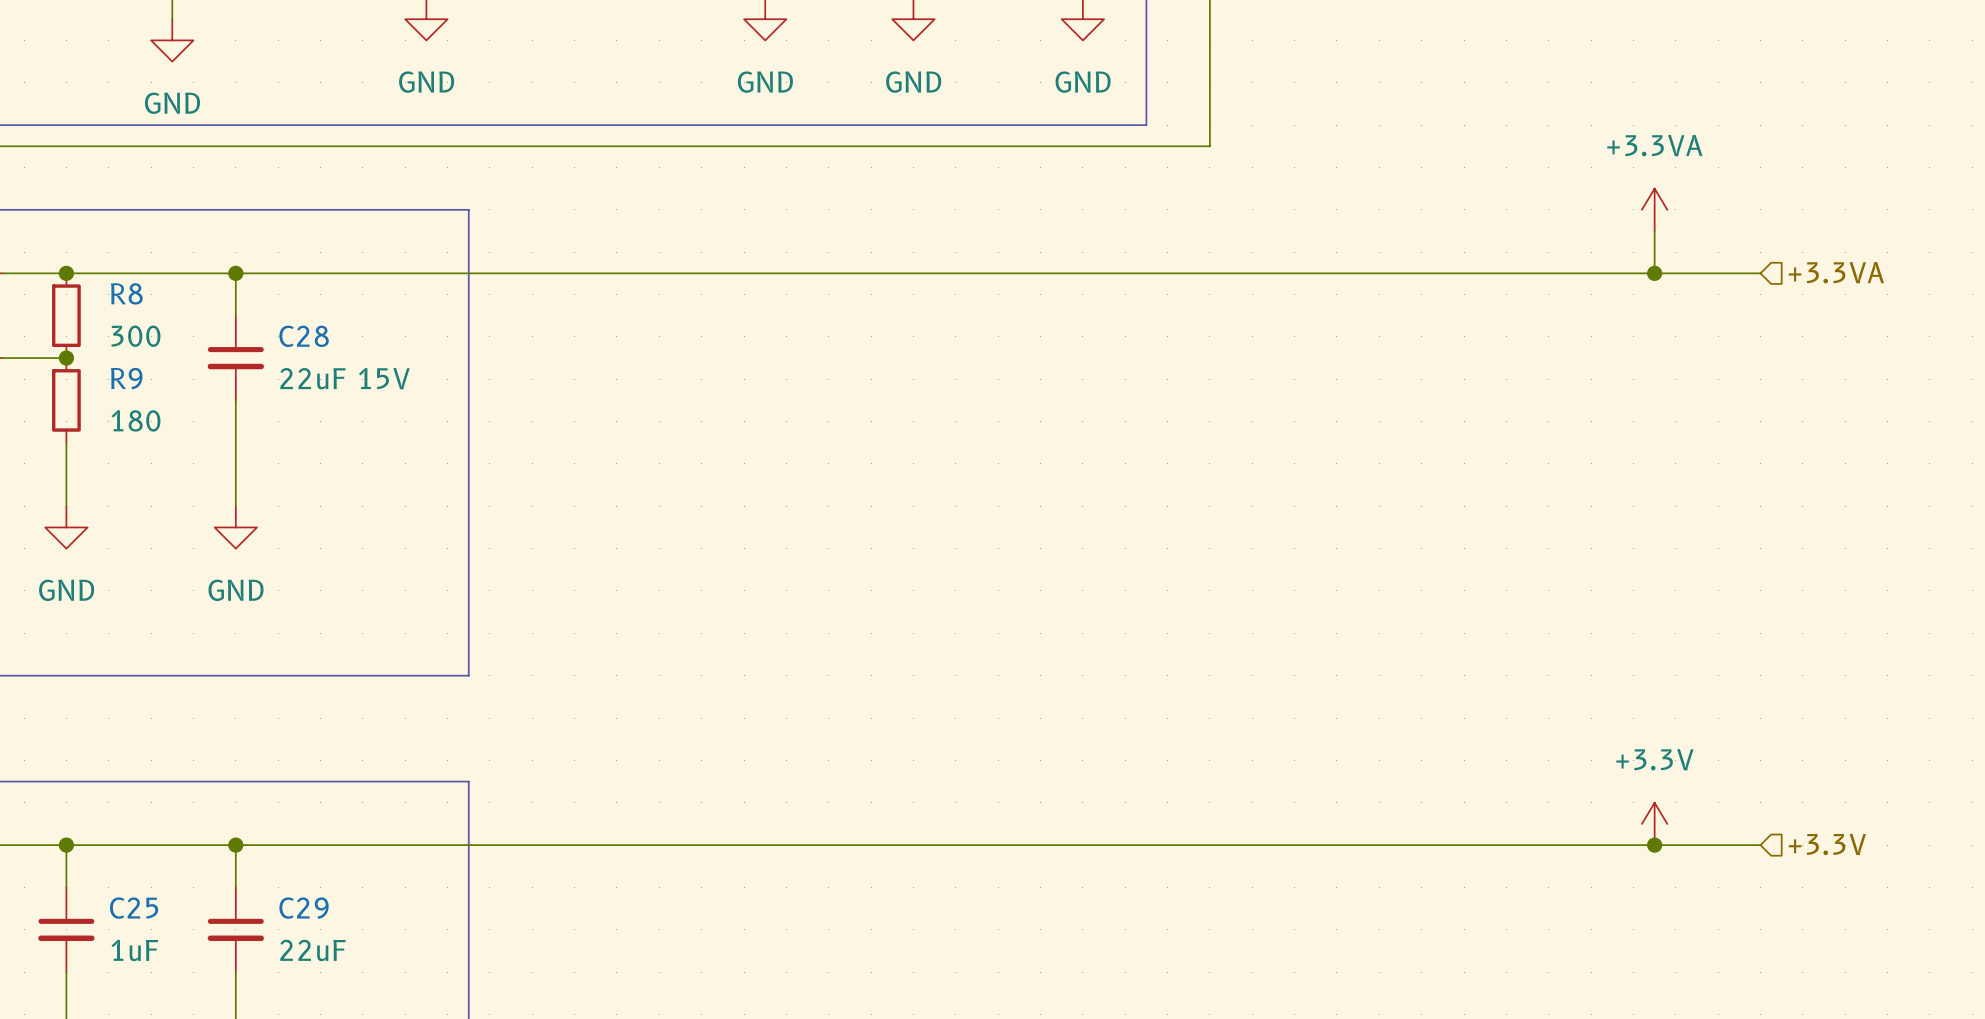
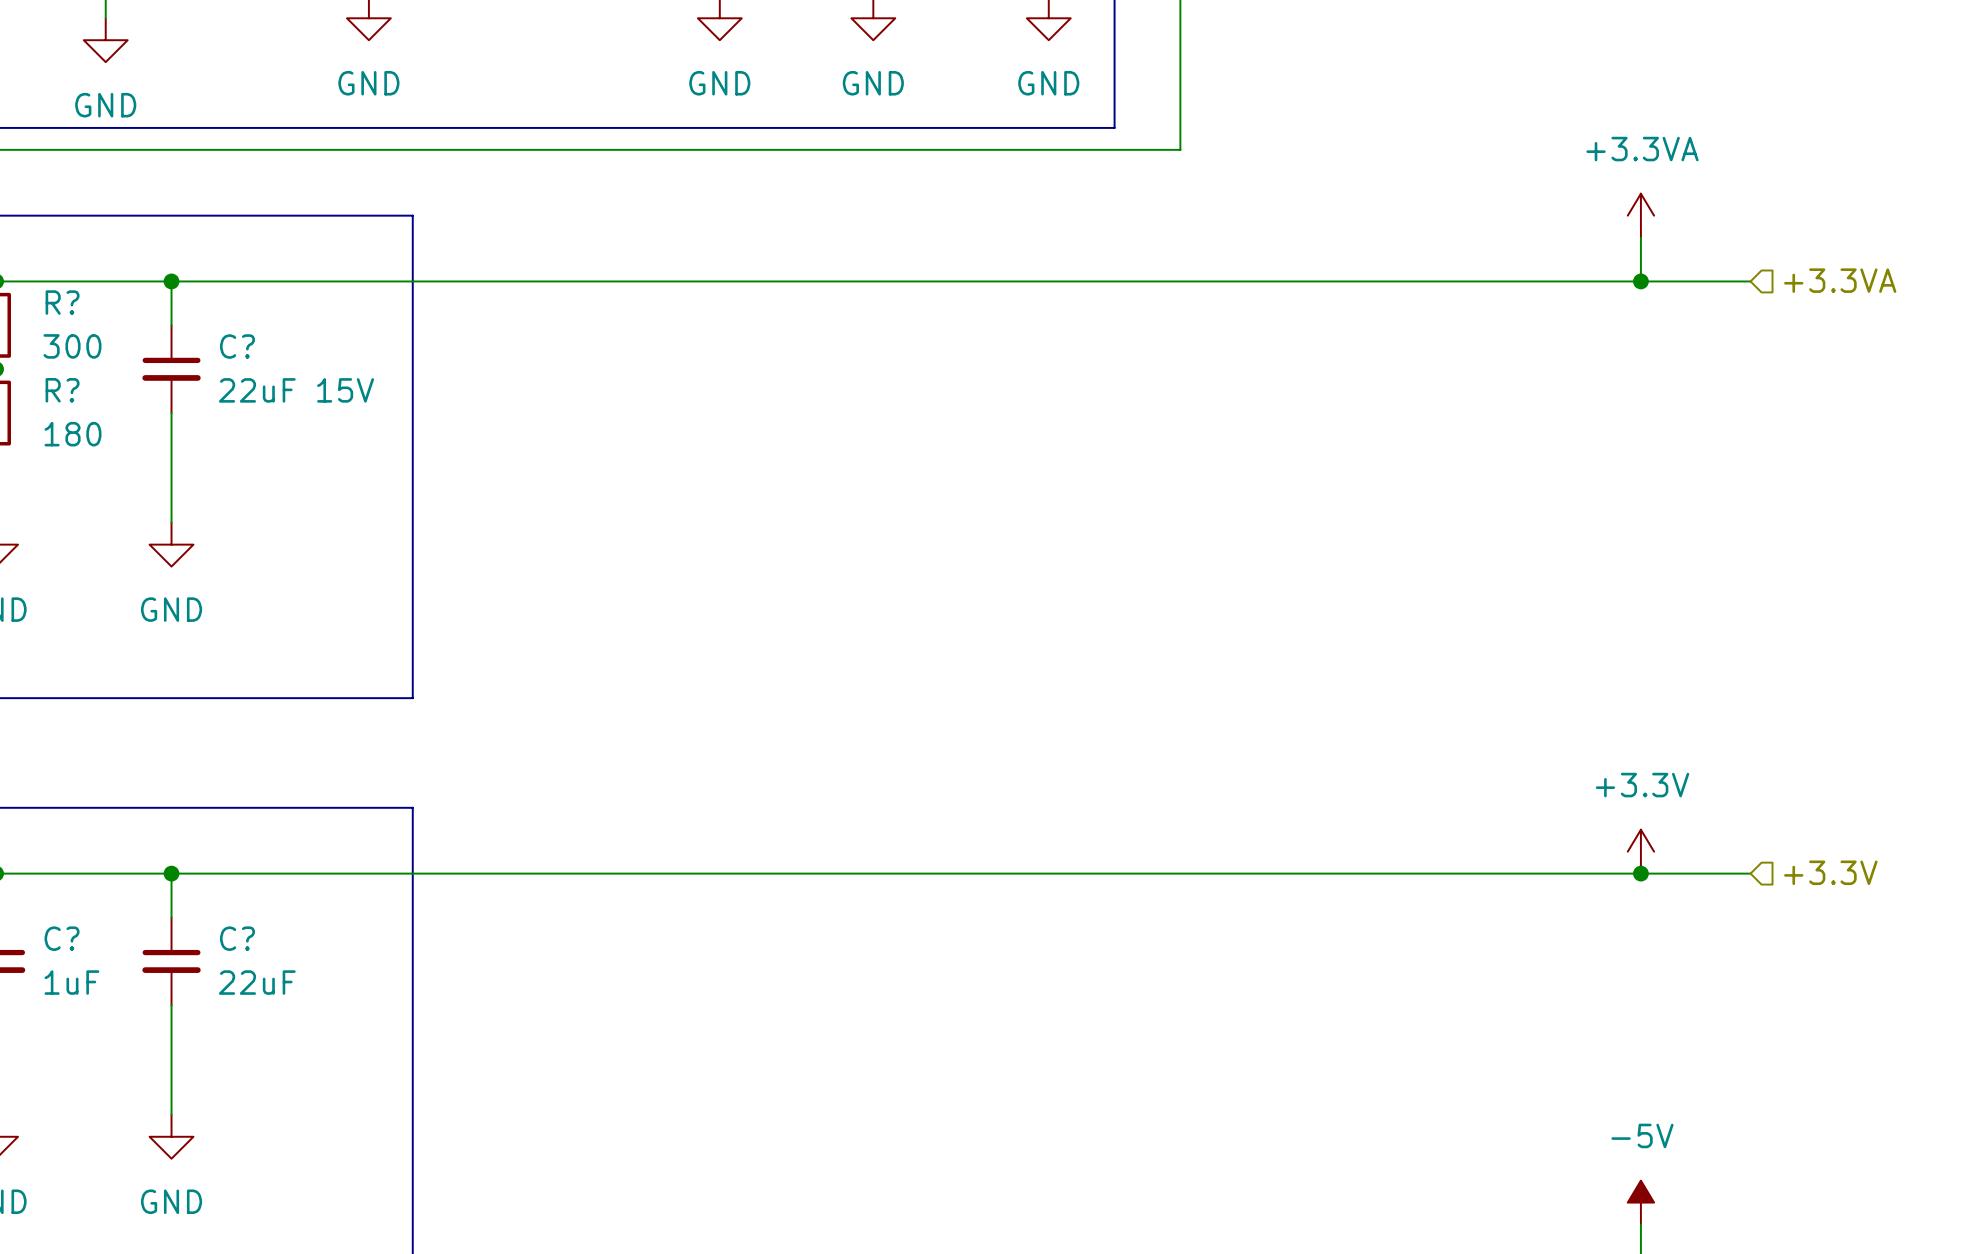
R8 name: R8 (126, 293) -> R? (62, 302)
C28 name: C28 (304, 336) -> C? (237, 346)
R9 name: R9 (126, 378) -> R? (62, 390)
C25 name: C25 (134, 908) -> C? (62, 938)
C29 name: C29 (304, 908) -> C? (237, 938)

